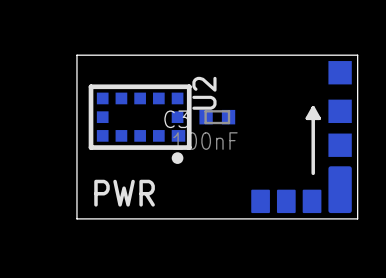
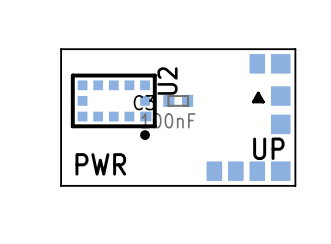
part: none -> (257, 63)
line: (313, 117) (313, 173) -> none
part footprint: [328, 166, 352, 214] -> [270, 161, 291, 181]
text: none -> UP (268, 148)

